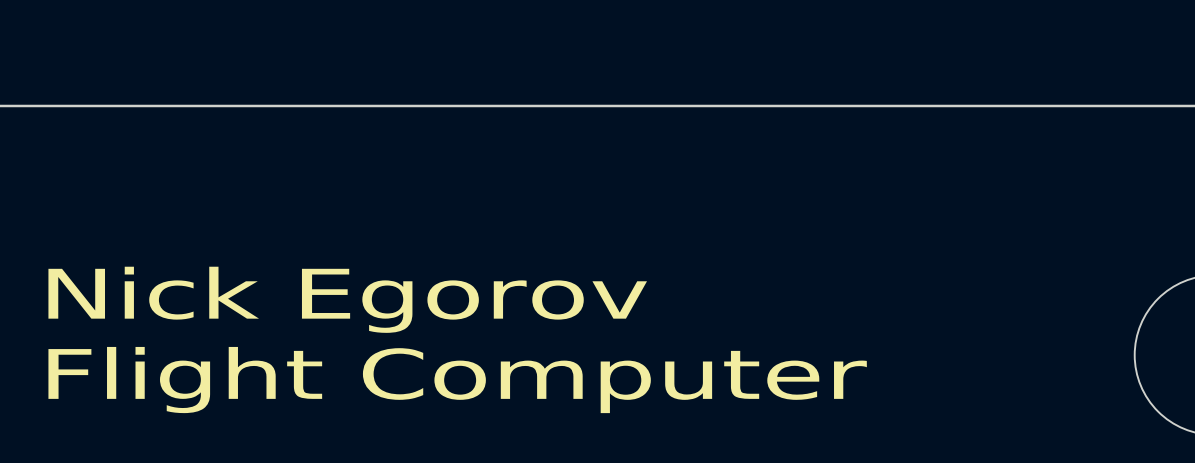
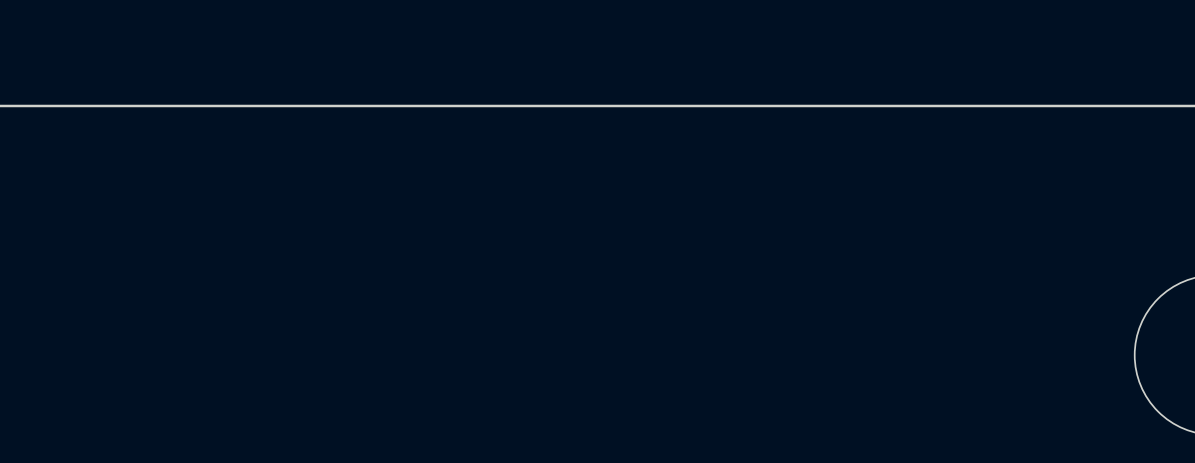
text: Nick Egorov (347, 299) -> none
text: Flight Computer (457, 380) -> none

